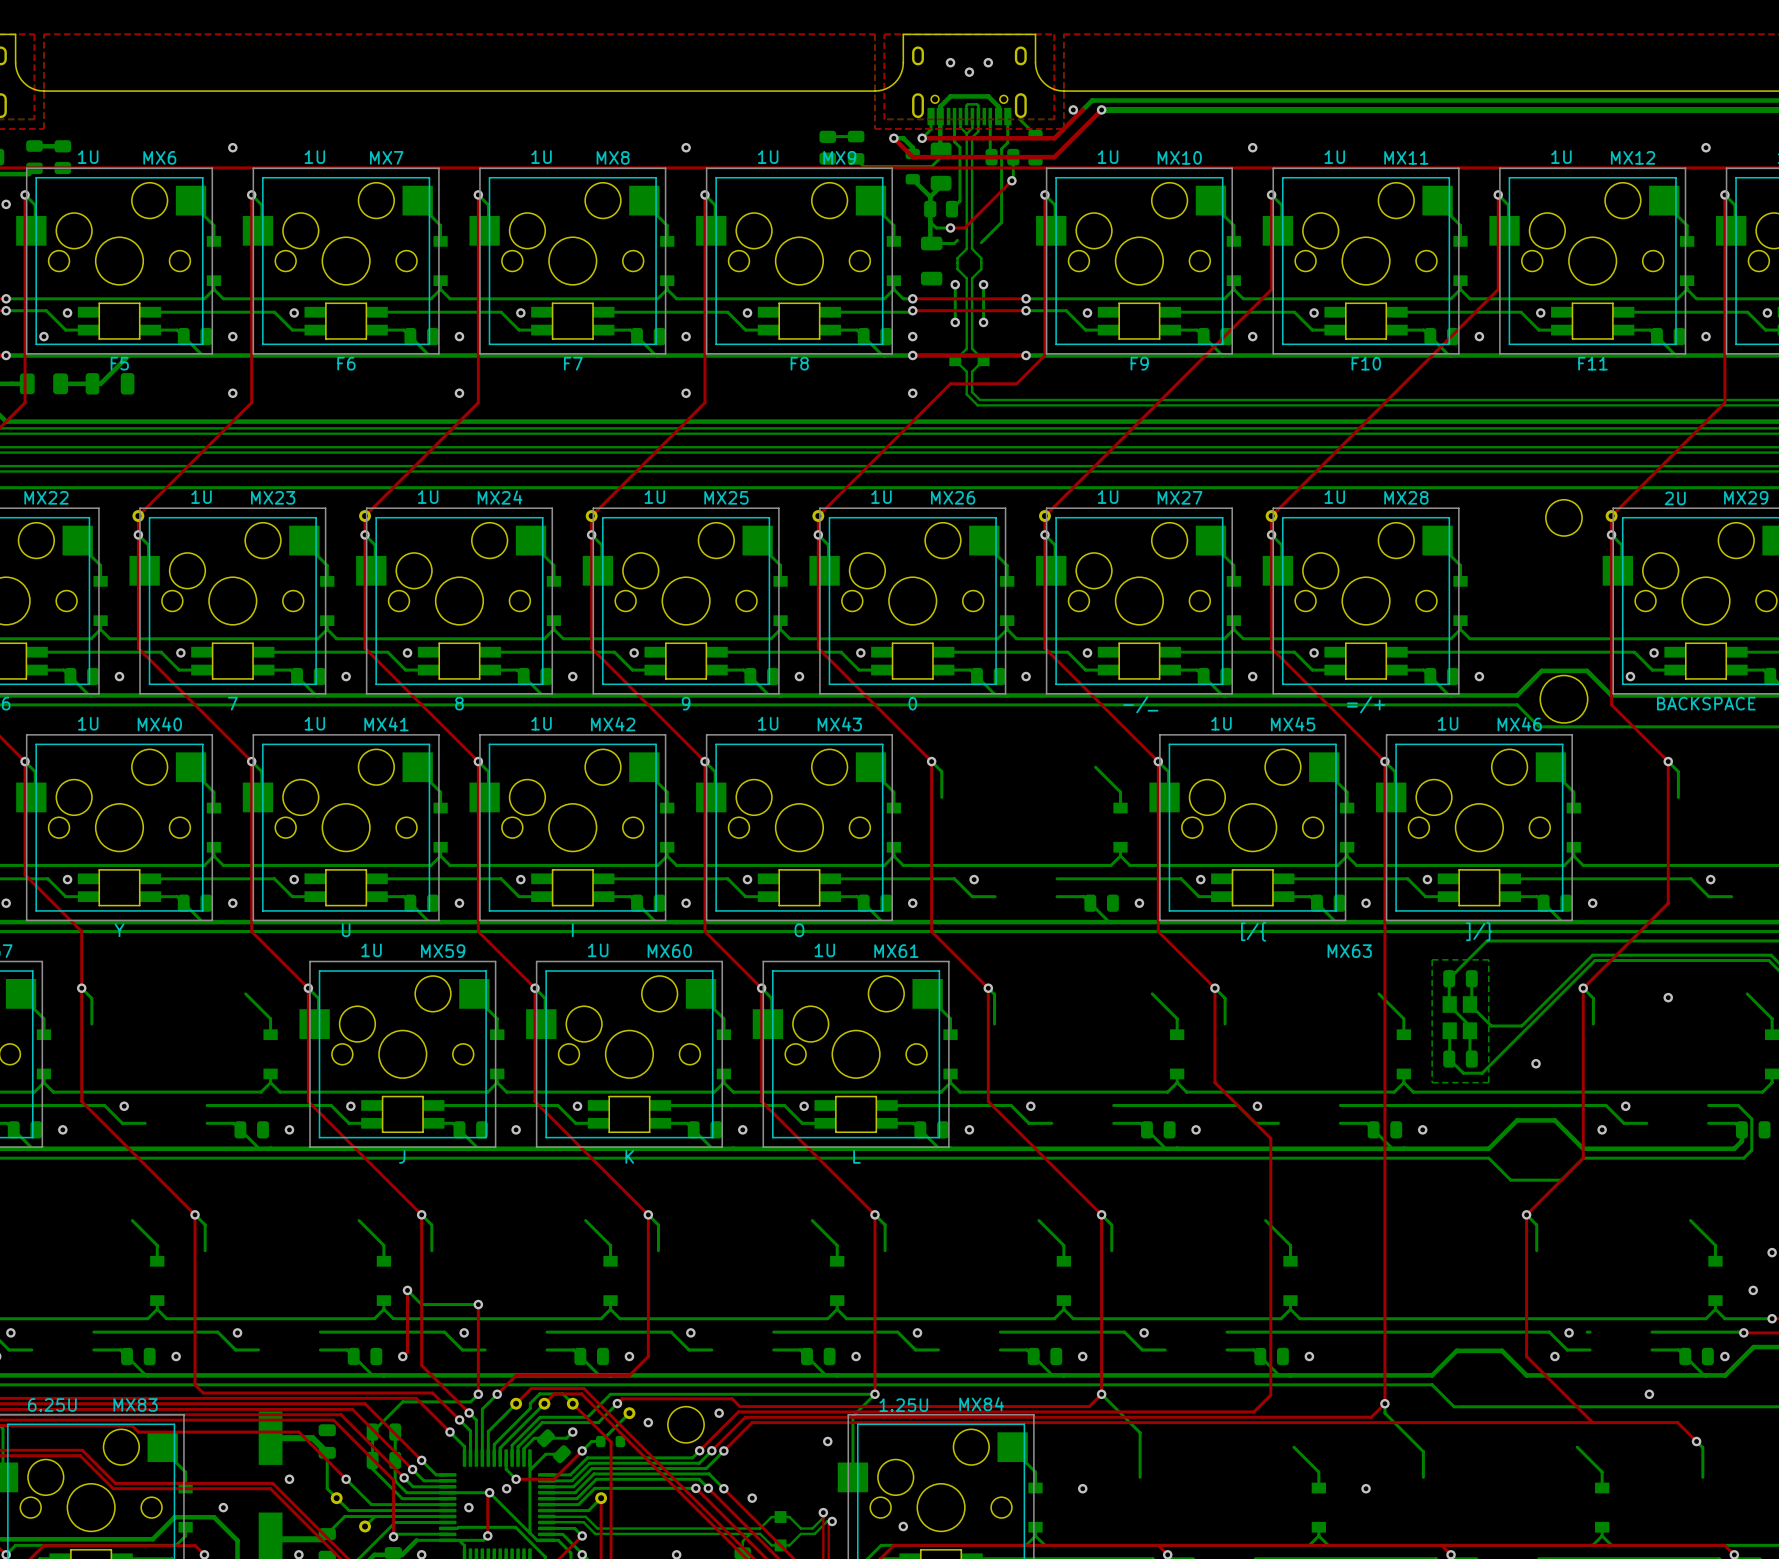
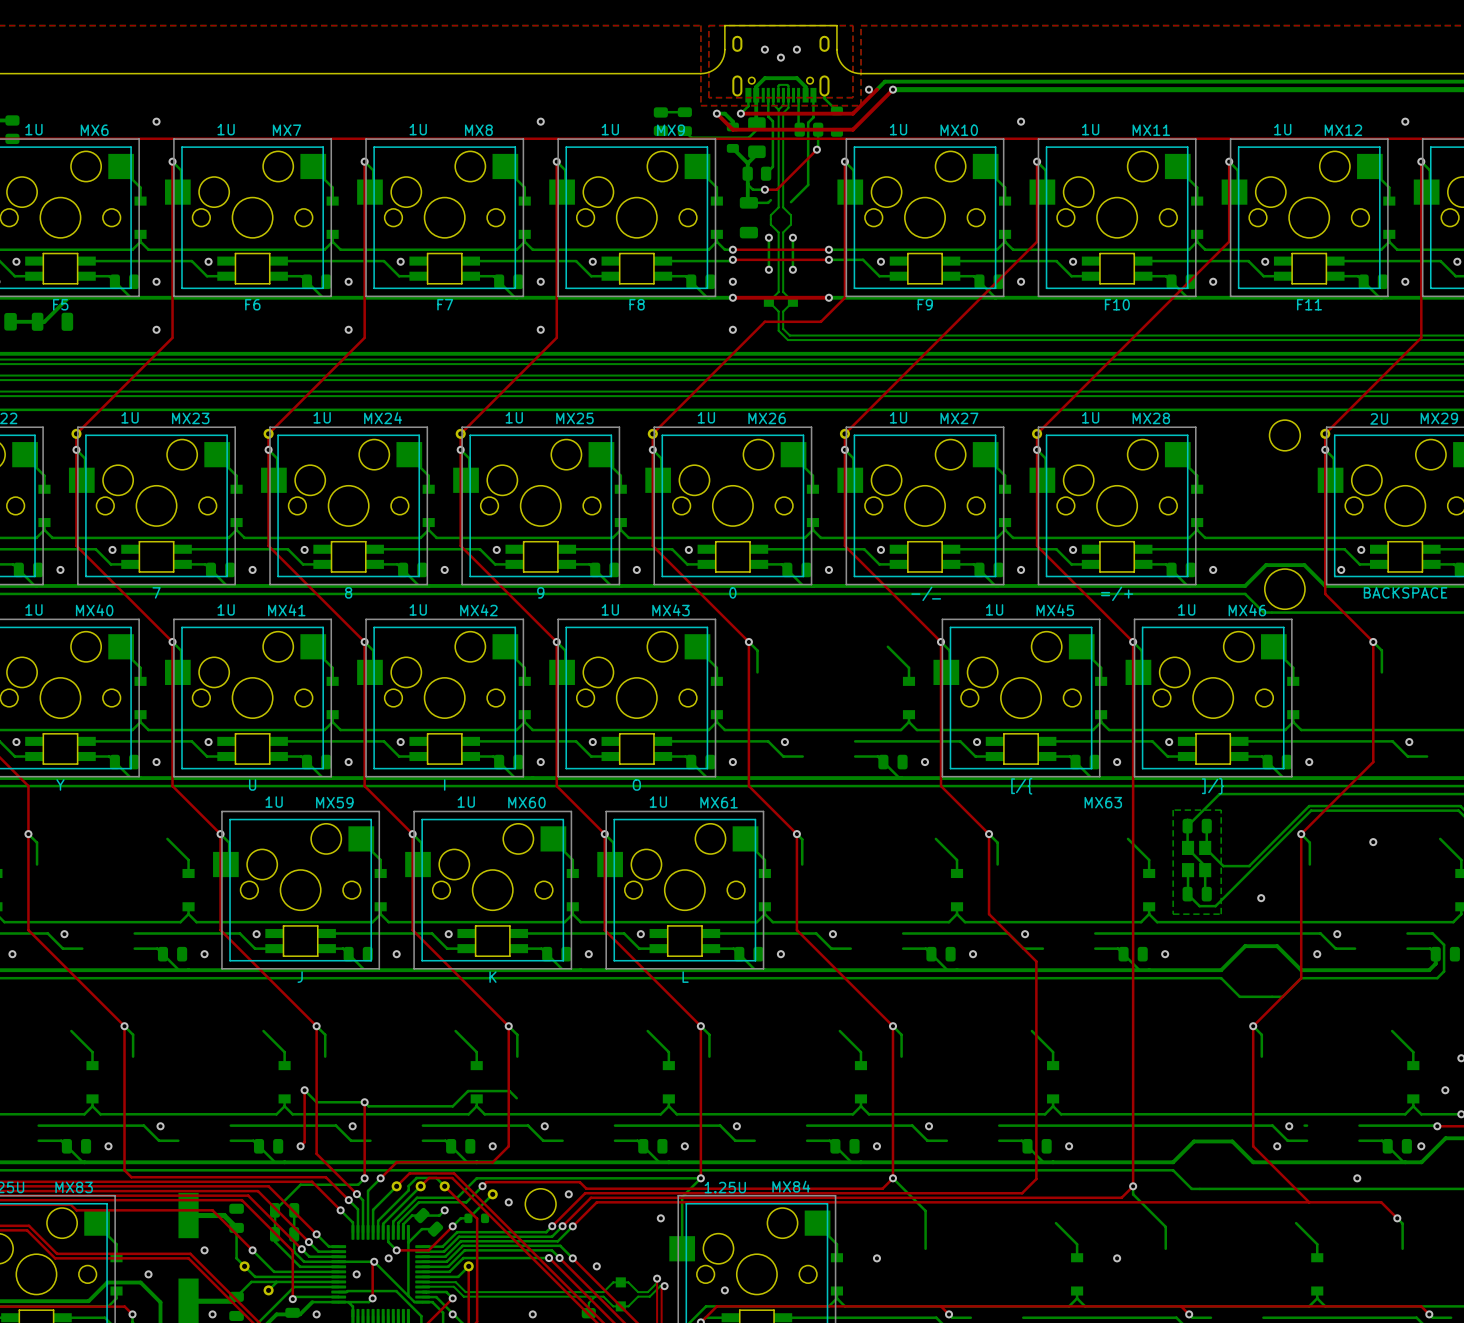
bottom track: none -> (516, 1098) (509, 1091) (468, 1091) (452, 1106) (368, 1106) (364, 1102)

